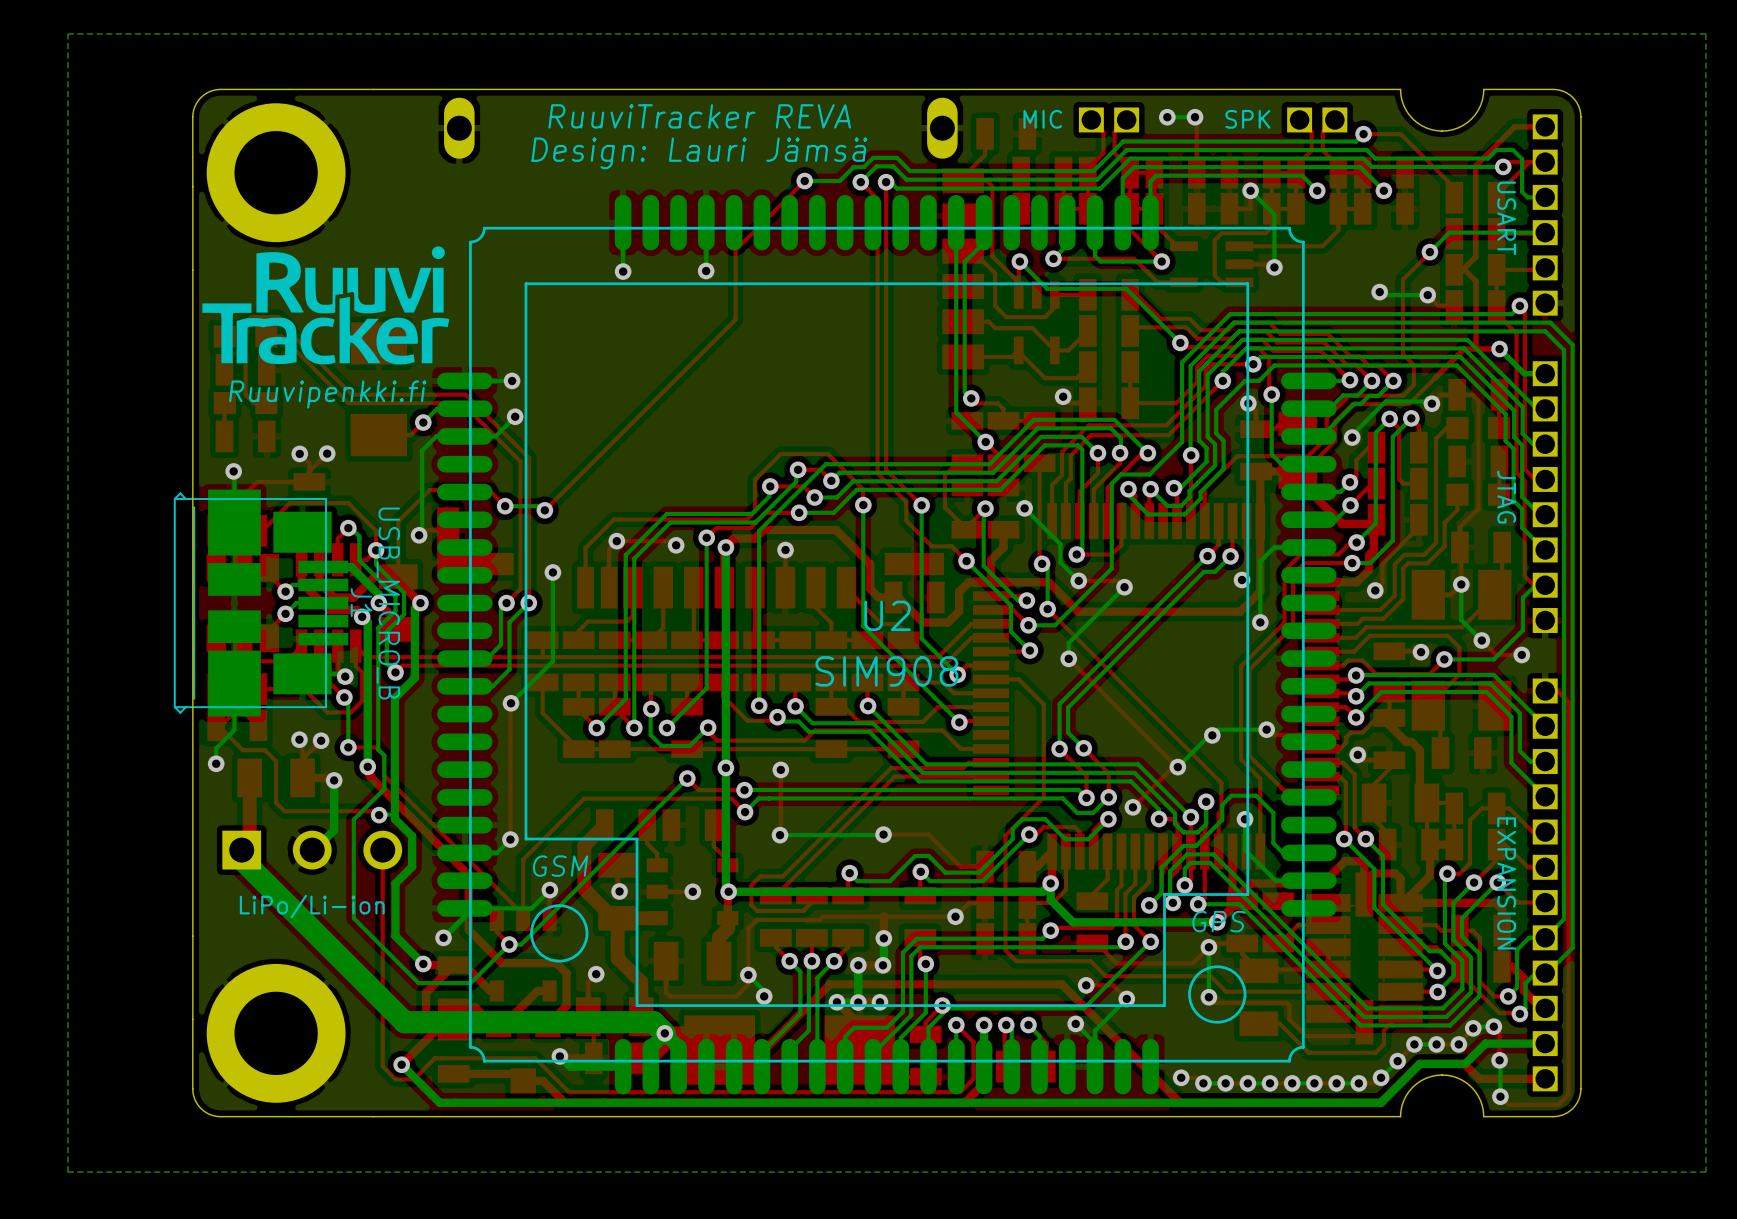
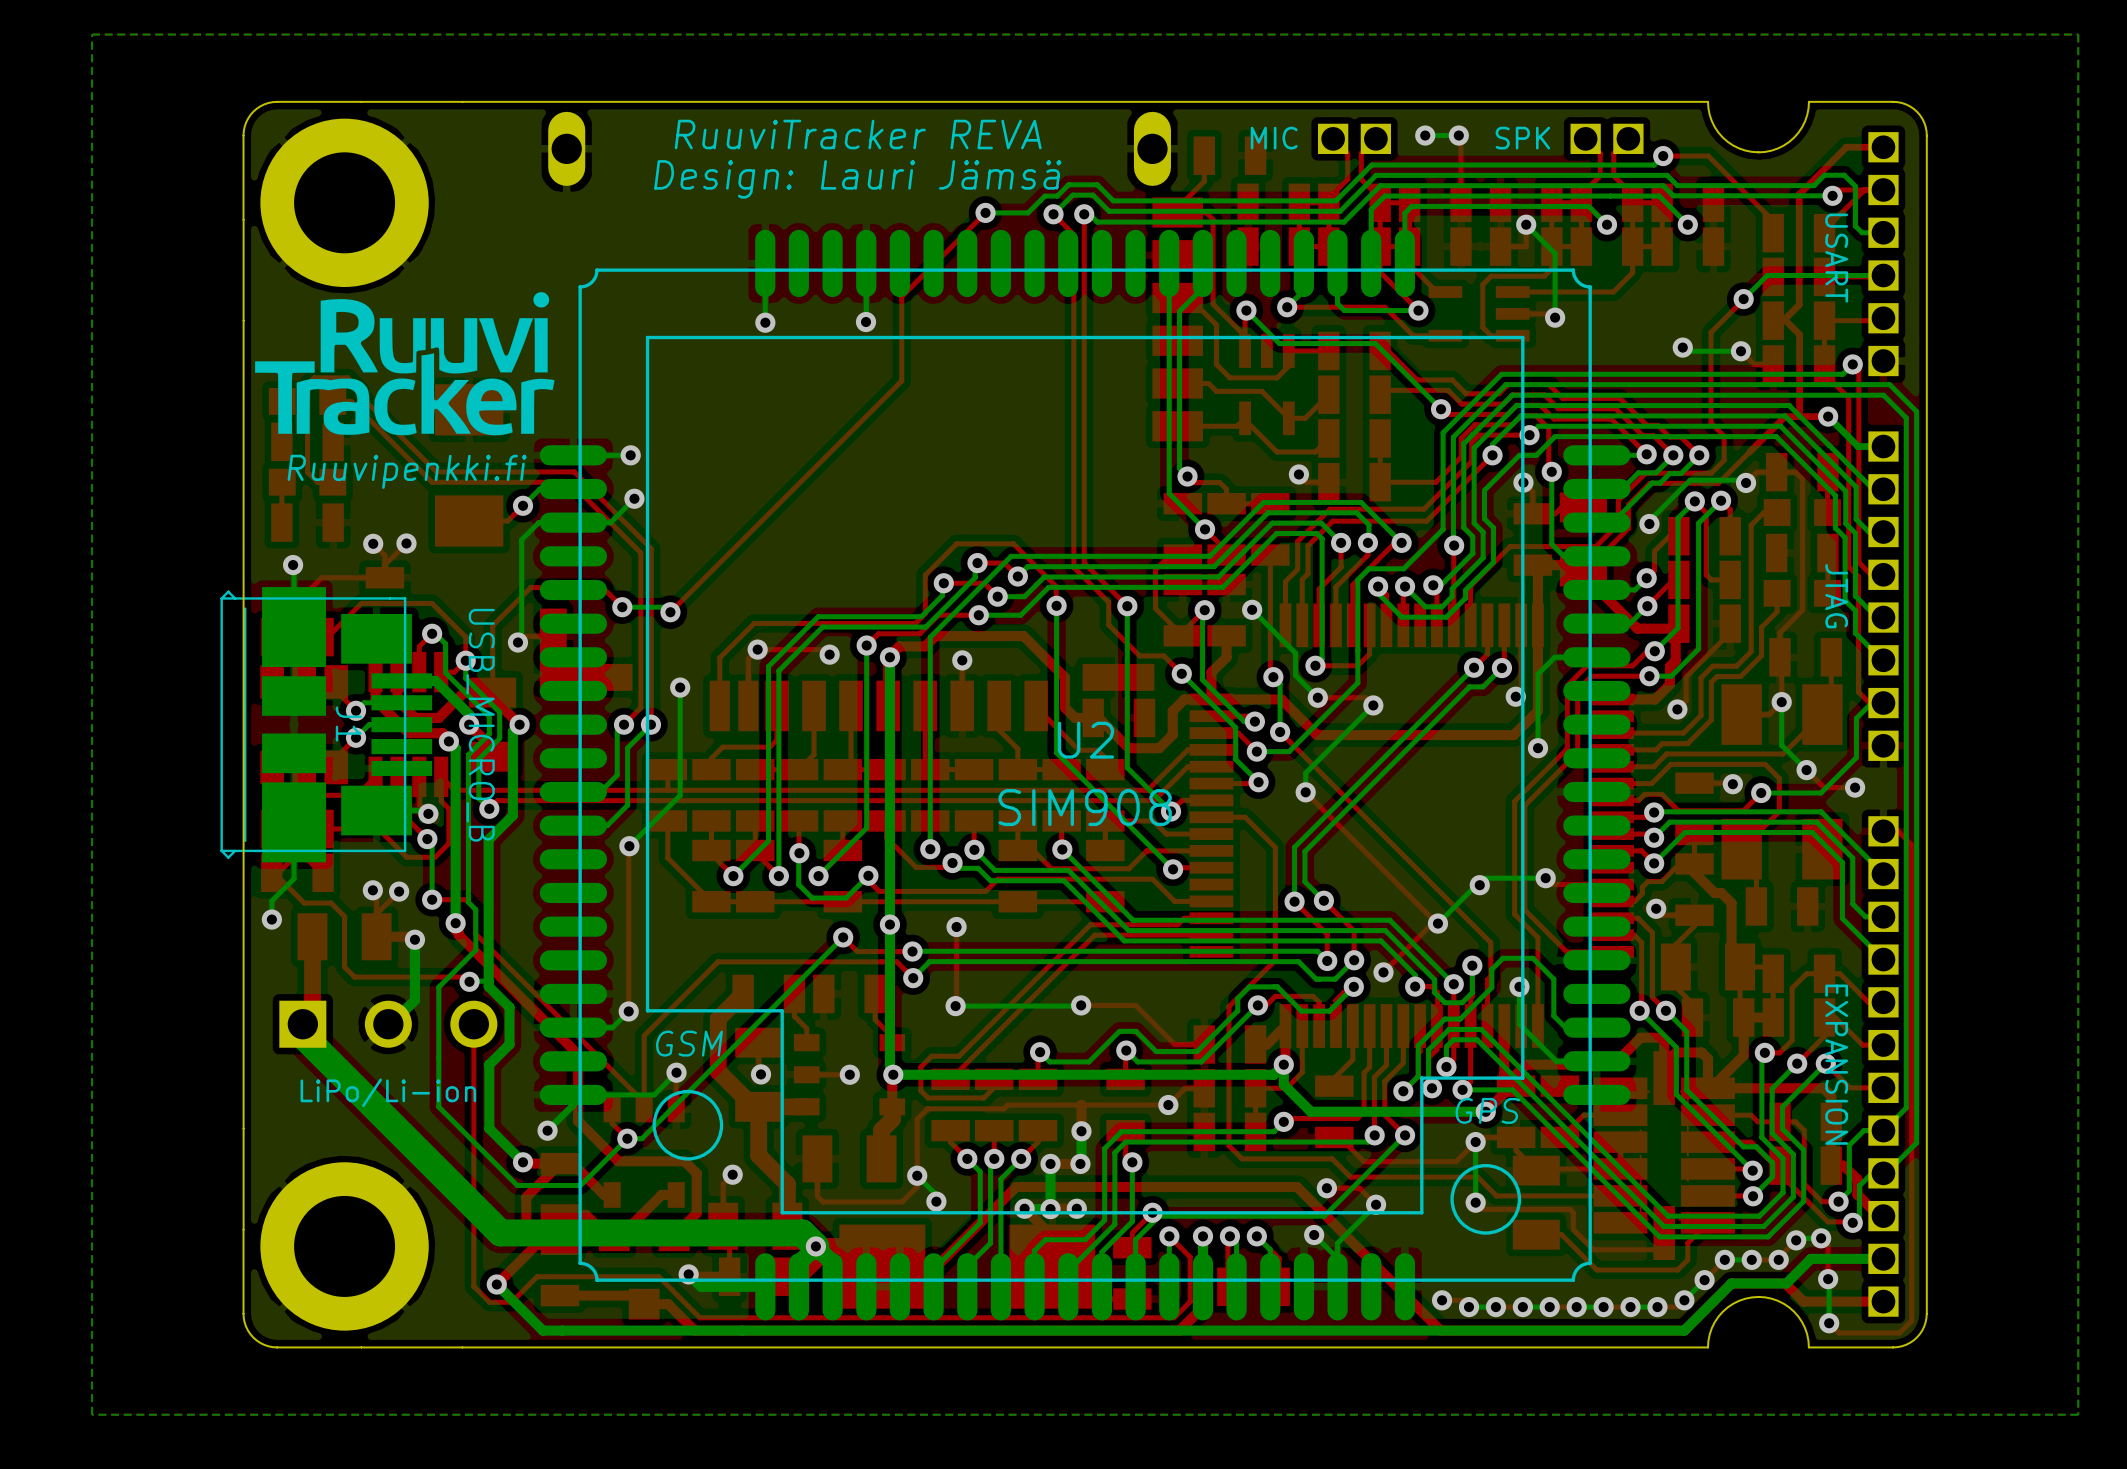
J1 name position: J1 (361, 602) -> J1 (348, 724)

